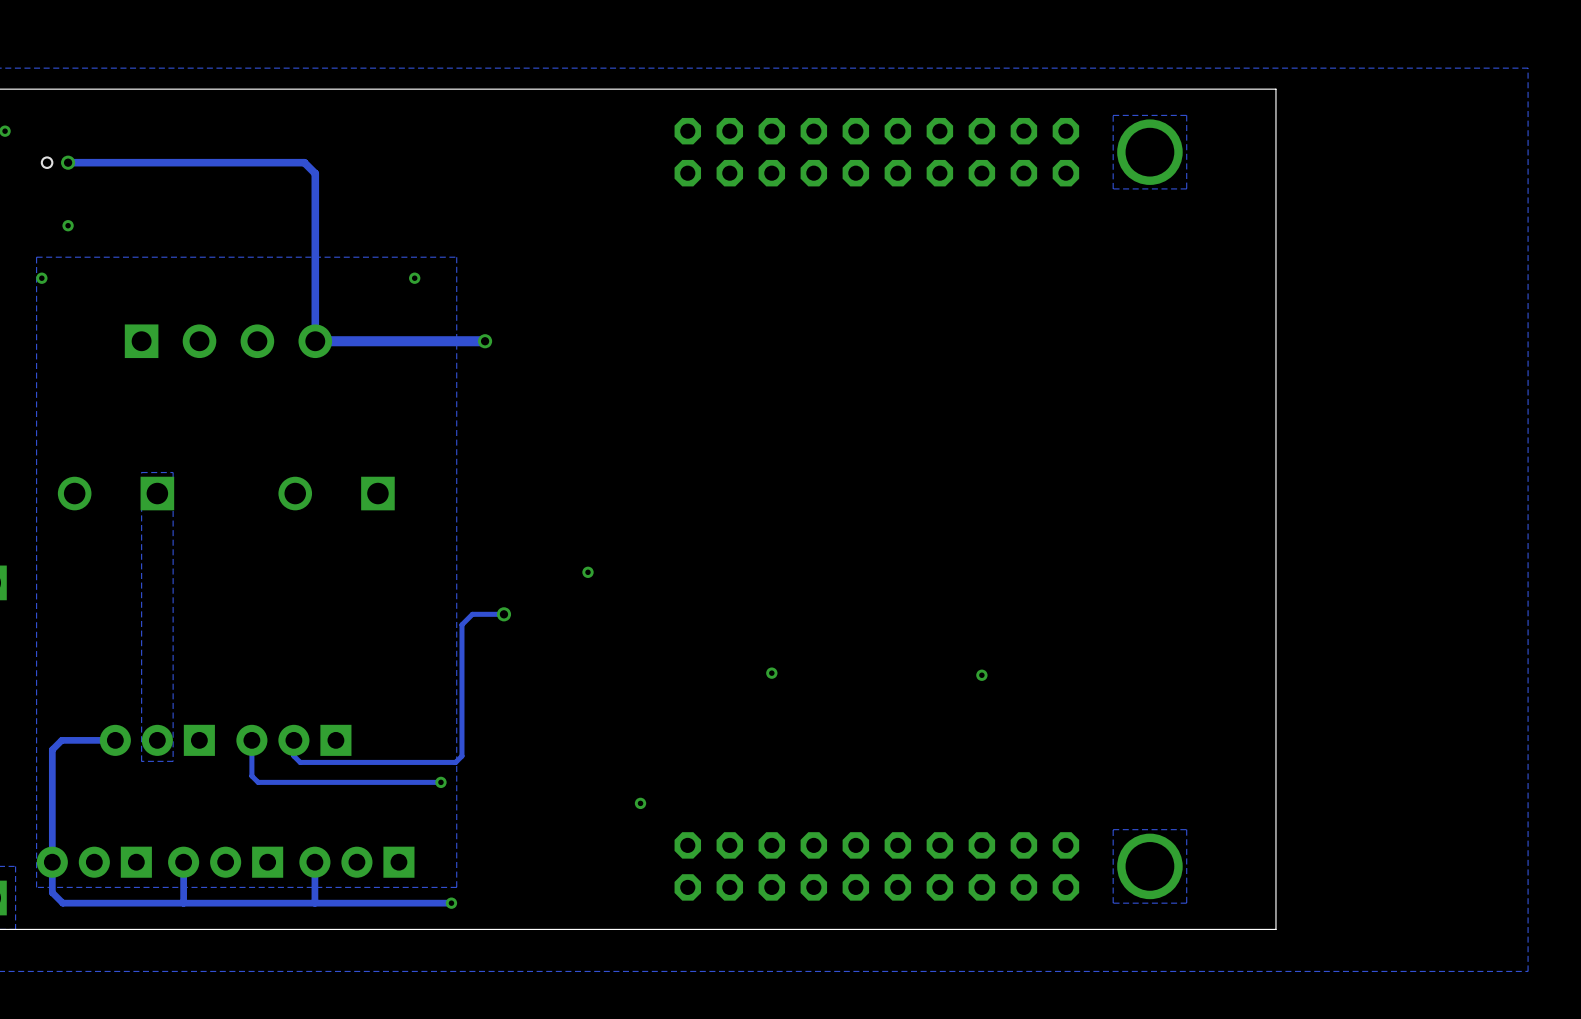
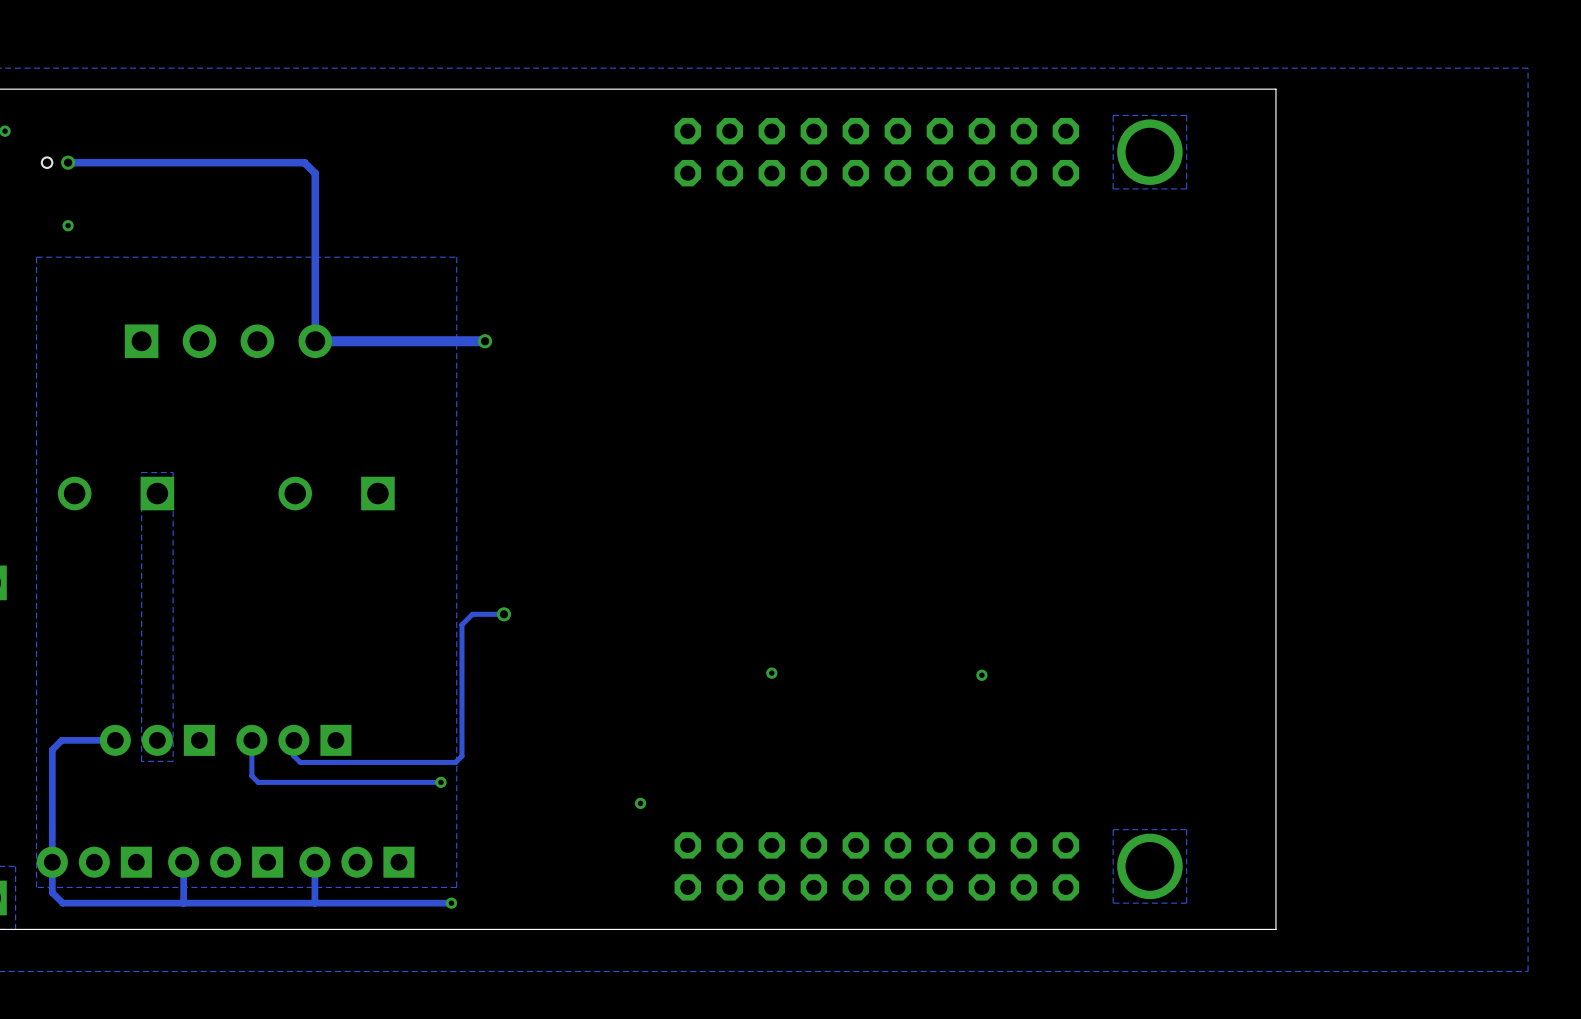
via: (41, 278) -> none
via: (414, 278) -> none
via: (588, 572) -> none

